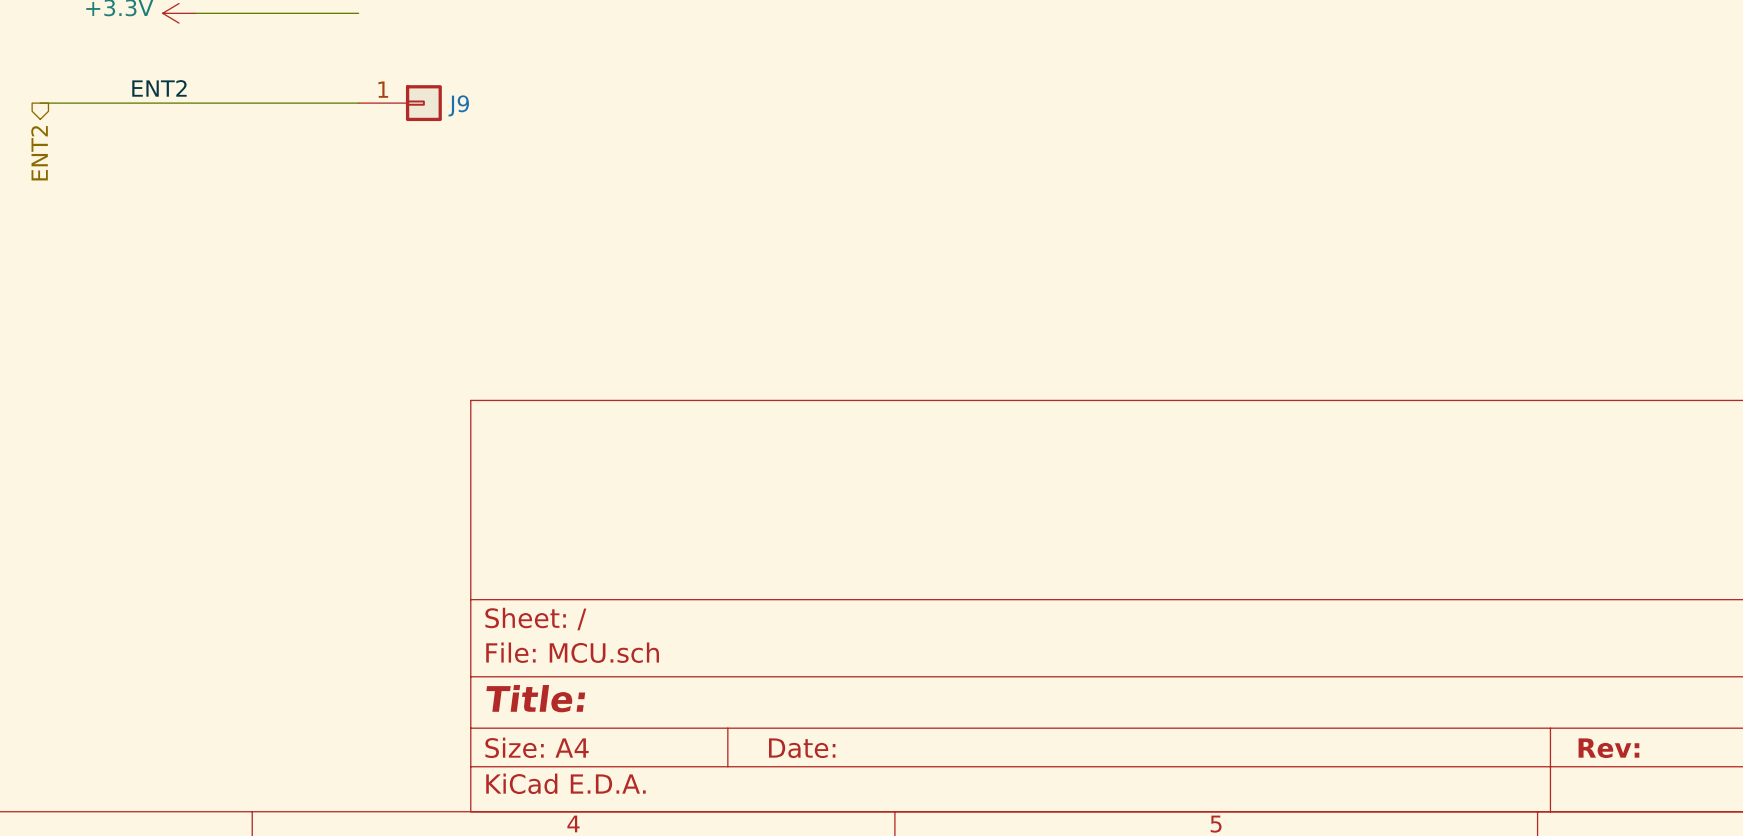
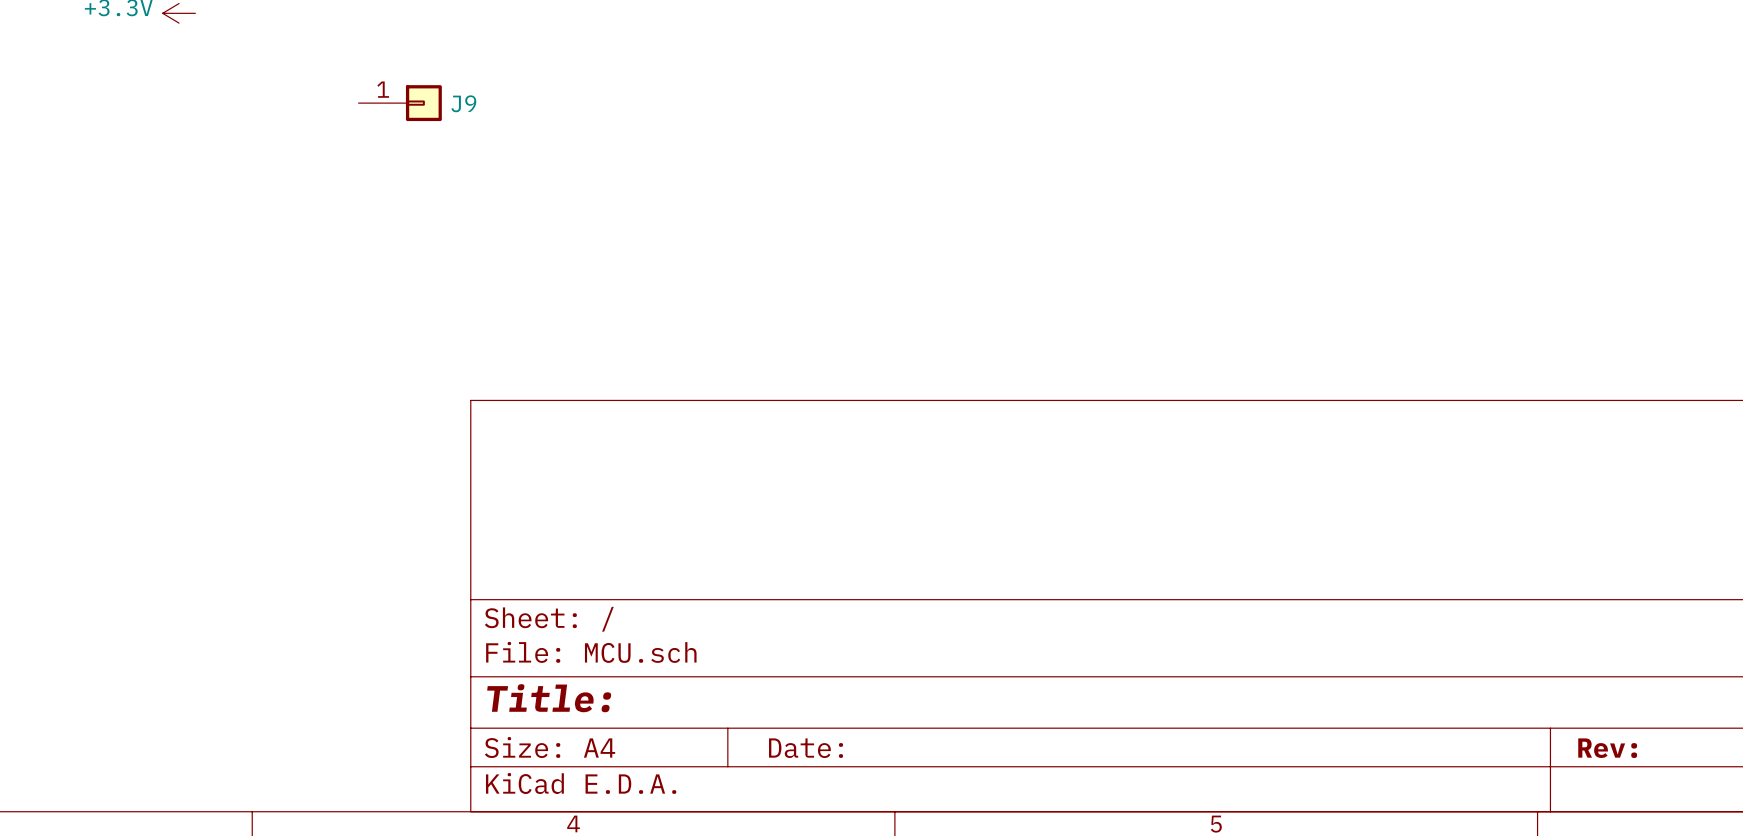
wire: (195, 13) (358, 13) -> none
label: ENT2 (159, 88) -> none
wire: (40, 103) (358, 103) -> none
hierarchical label: ENT2 (39, 153) -> none

